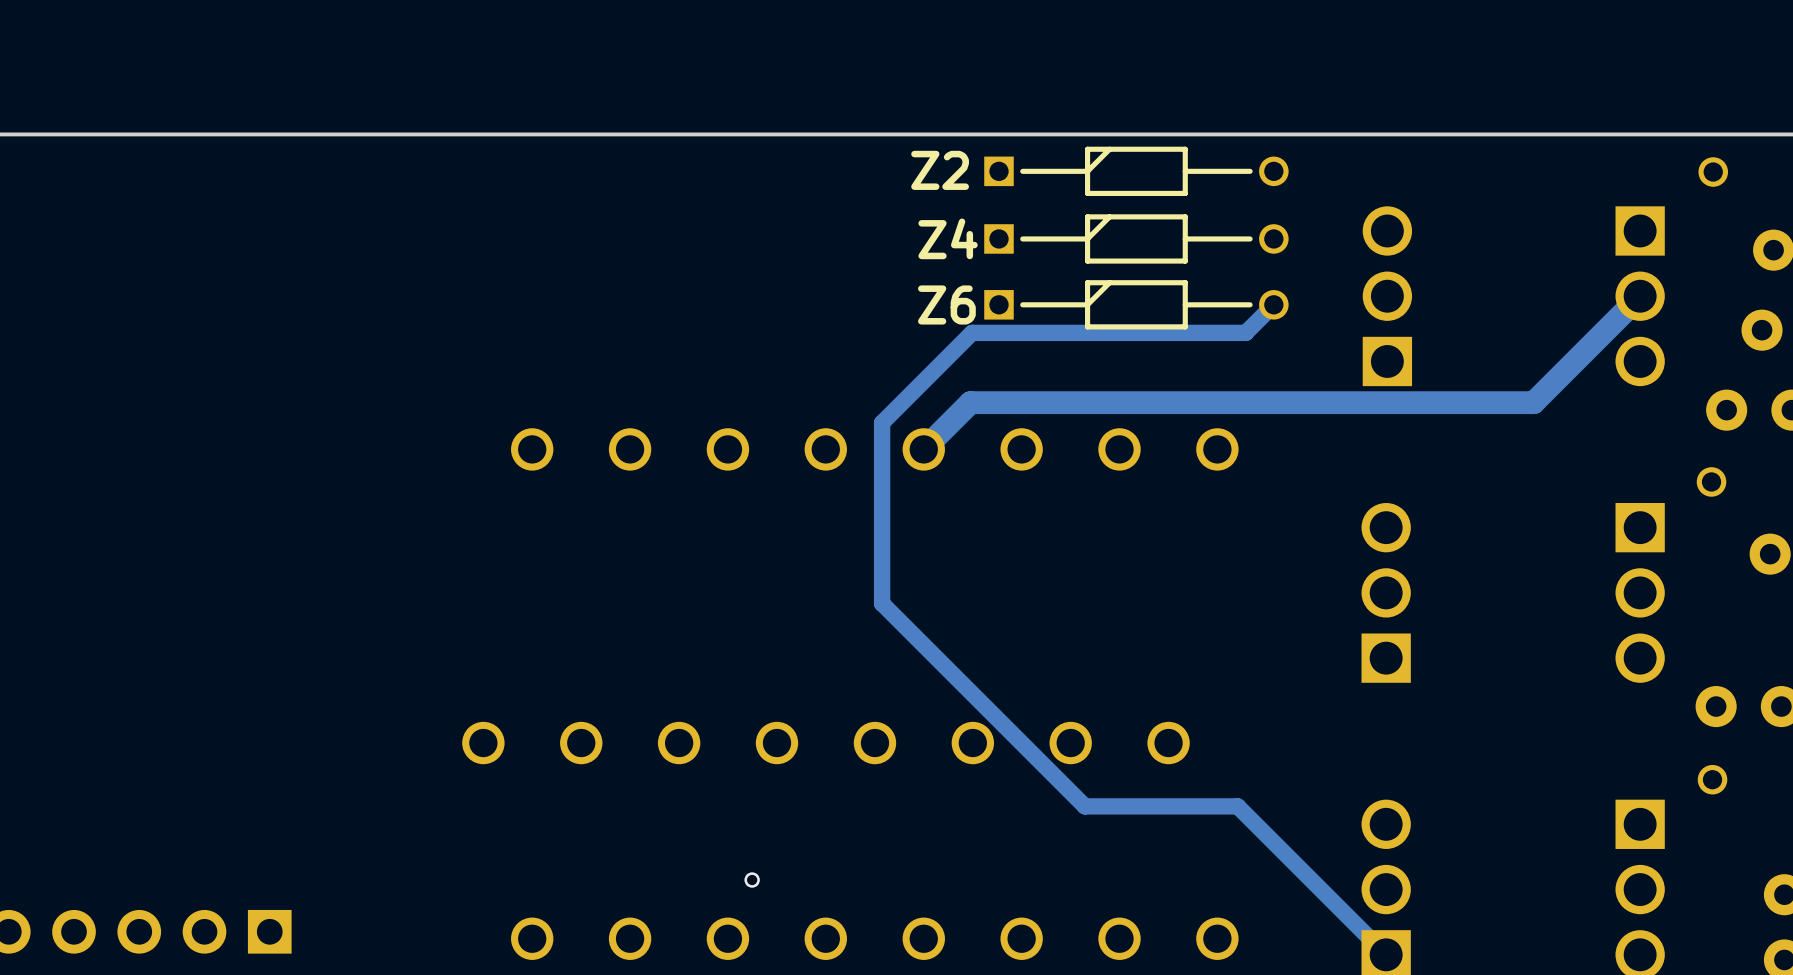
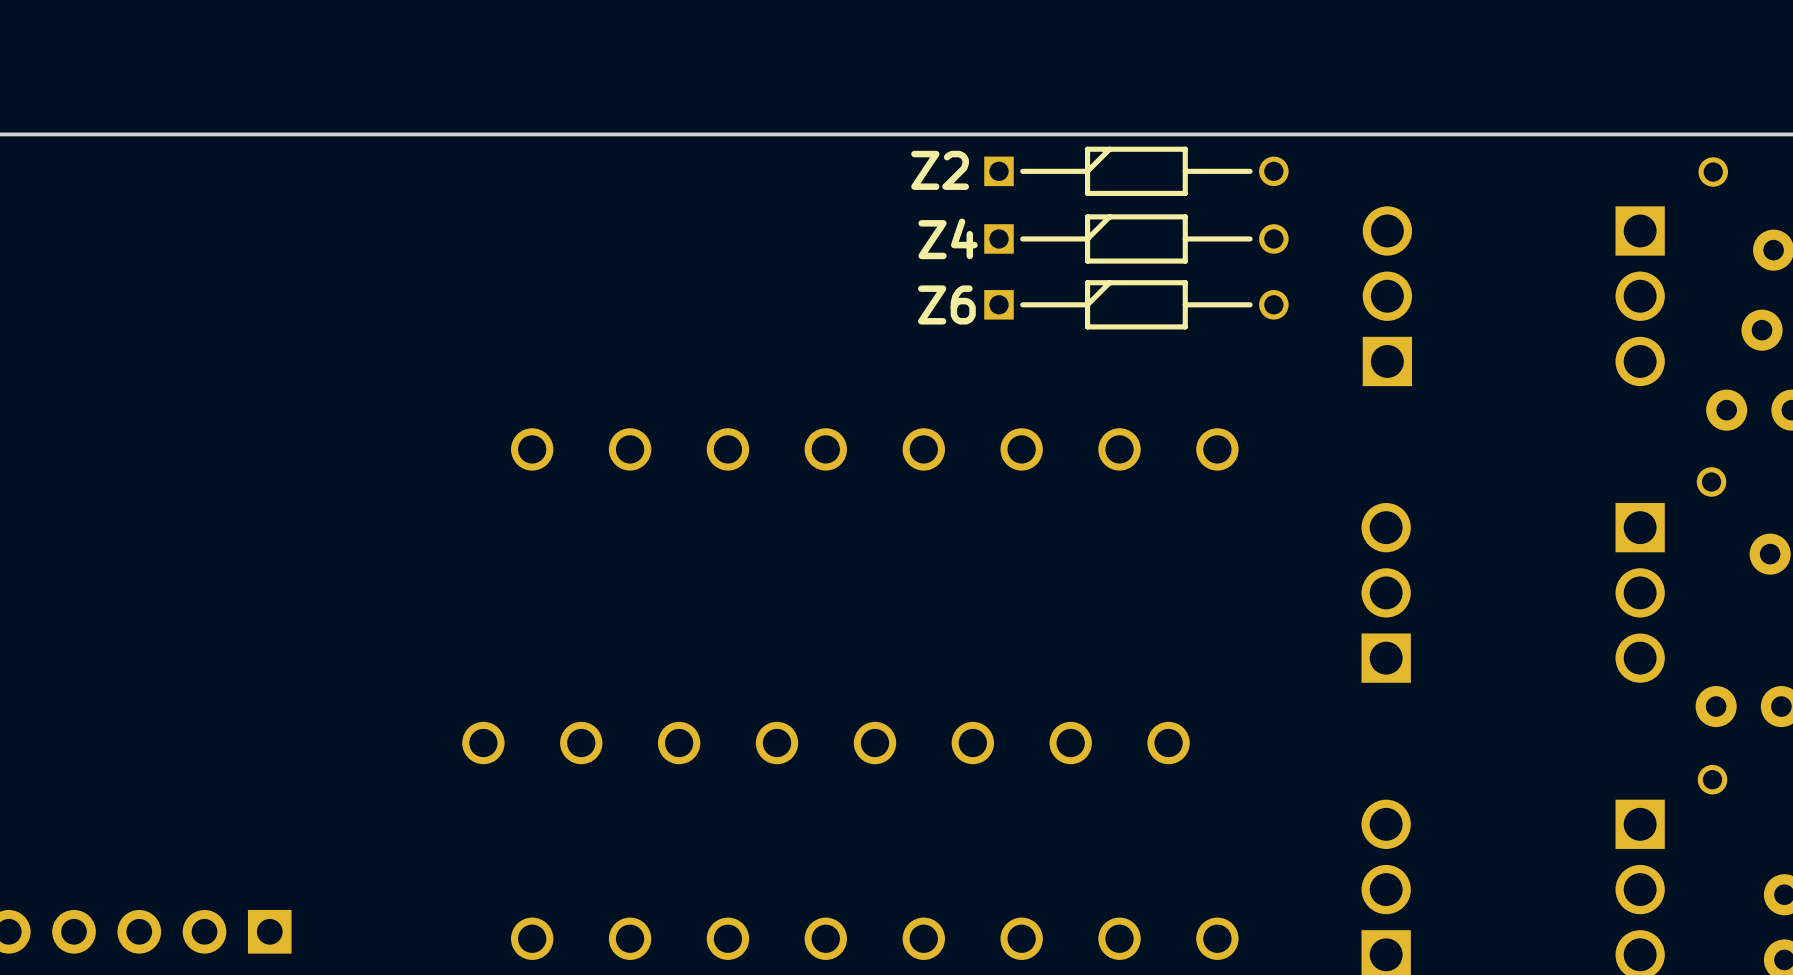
track: (1640, 296) (1533, 402) (970, 402) (923, 449) -> none
track: (1273, 304) (1245, 332) (972, 332) (882, 422) (882, 603) (1084, 806) (1237, 806) (1386, 954) -> none
via: (752, 880) -> none

